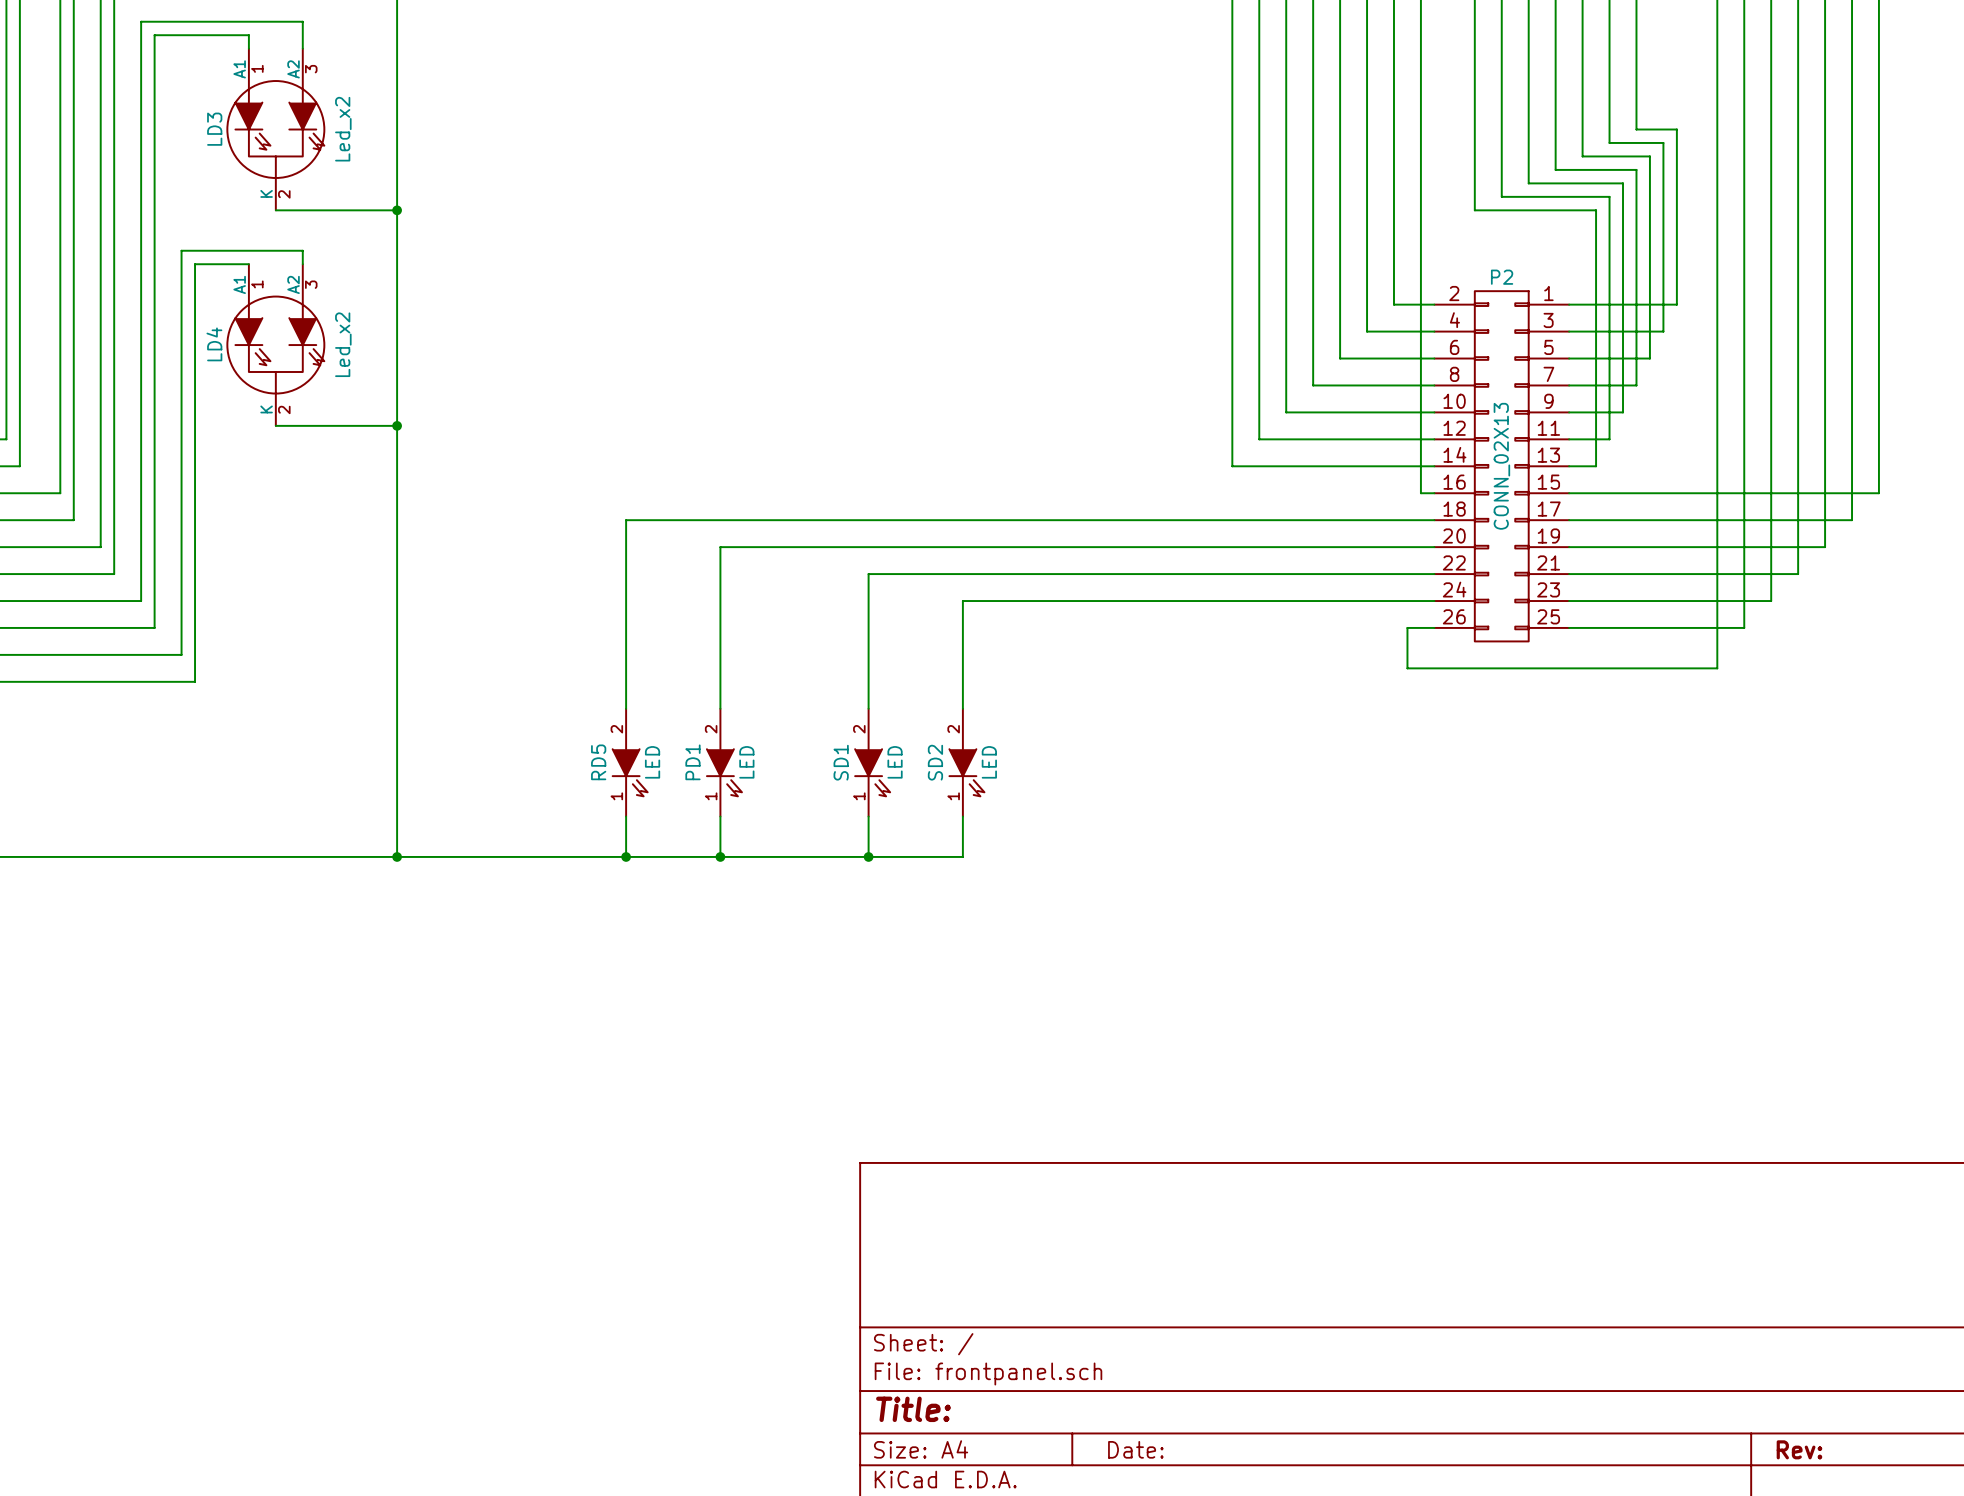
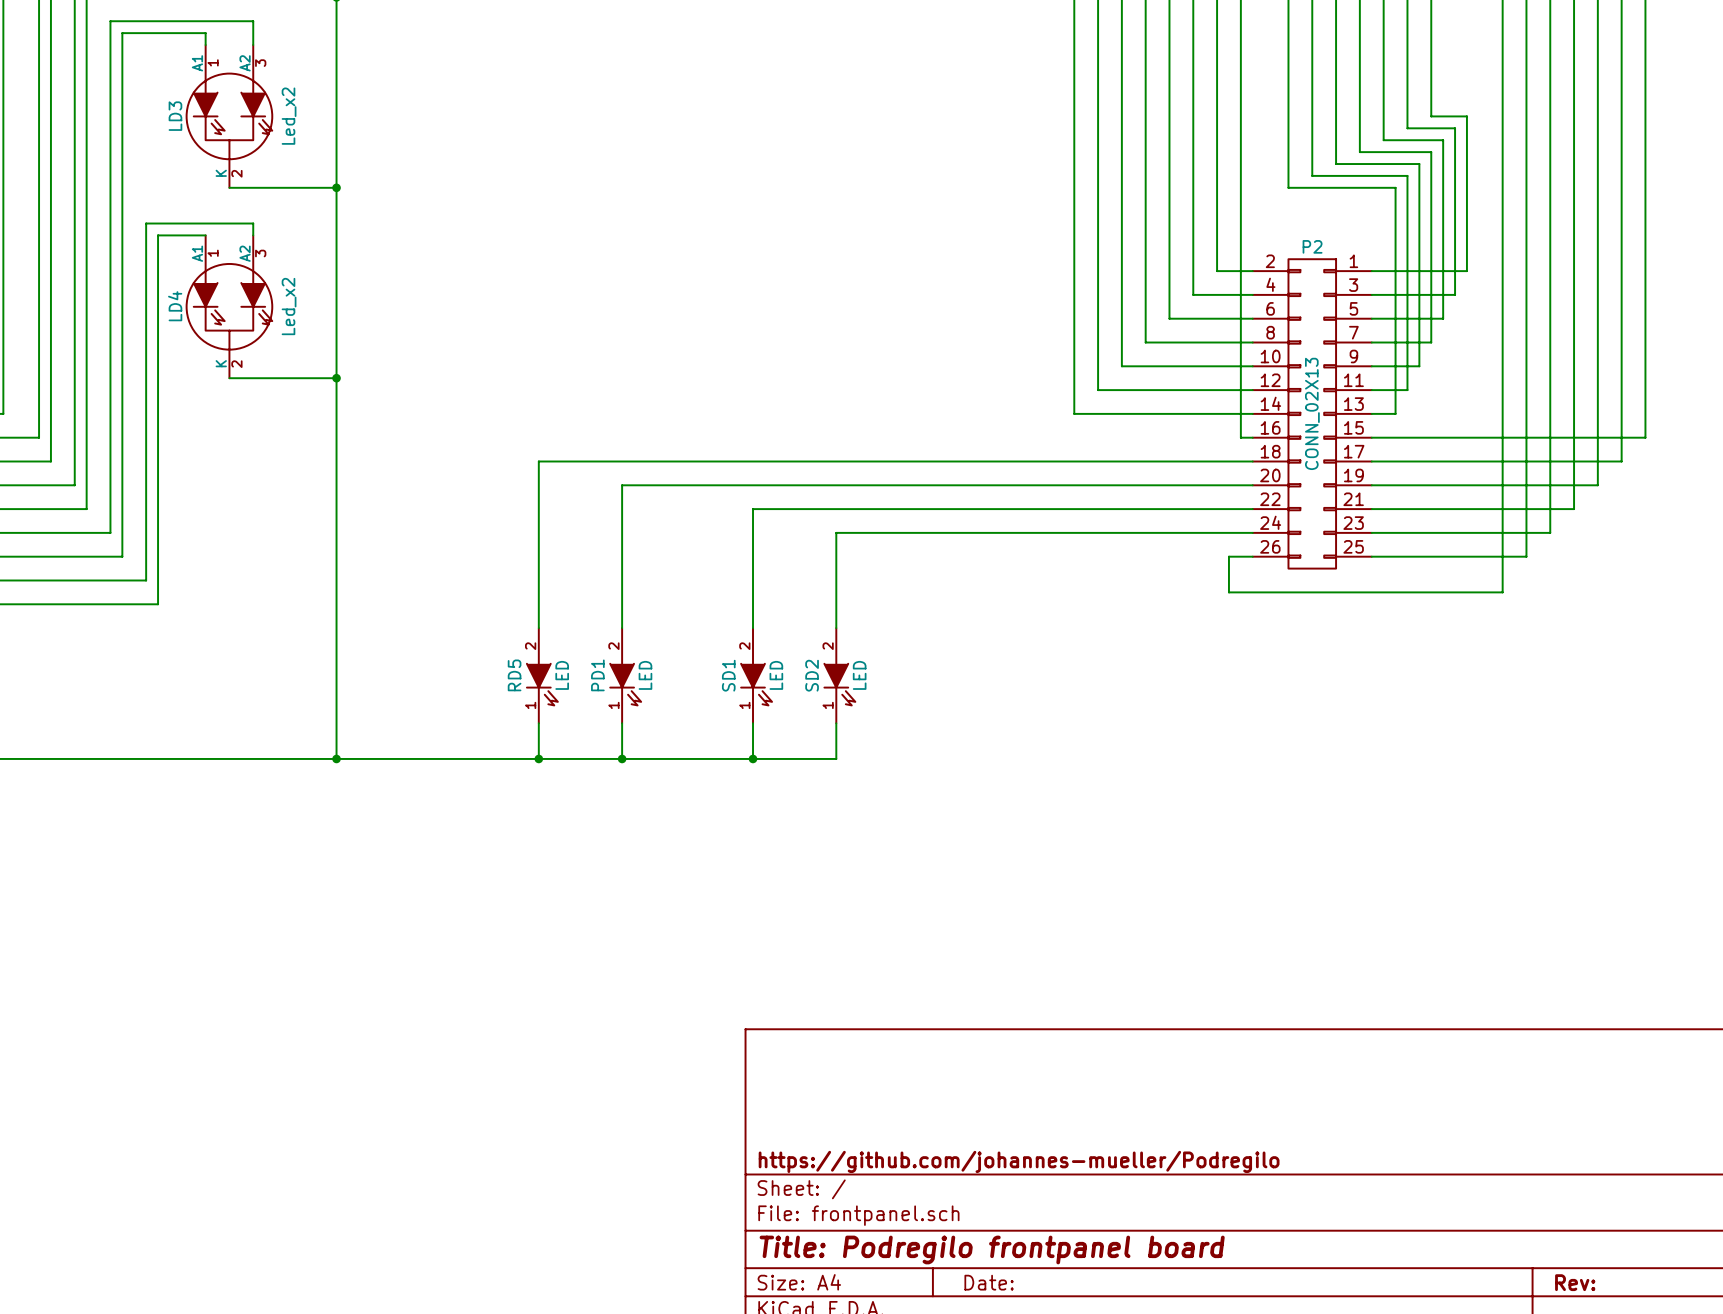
title block: none -> https://github.com/johannes-mueller/Podregilo (1019, 1161)
title block: Title: (913, 1409) -> Title: Podregilo frontpanel board (992, 1249)

